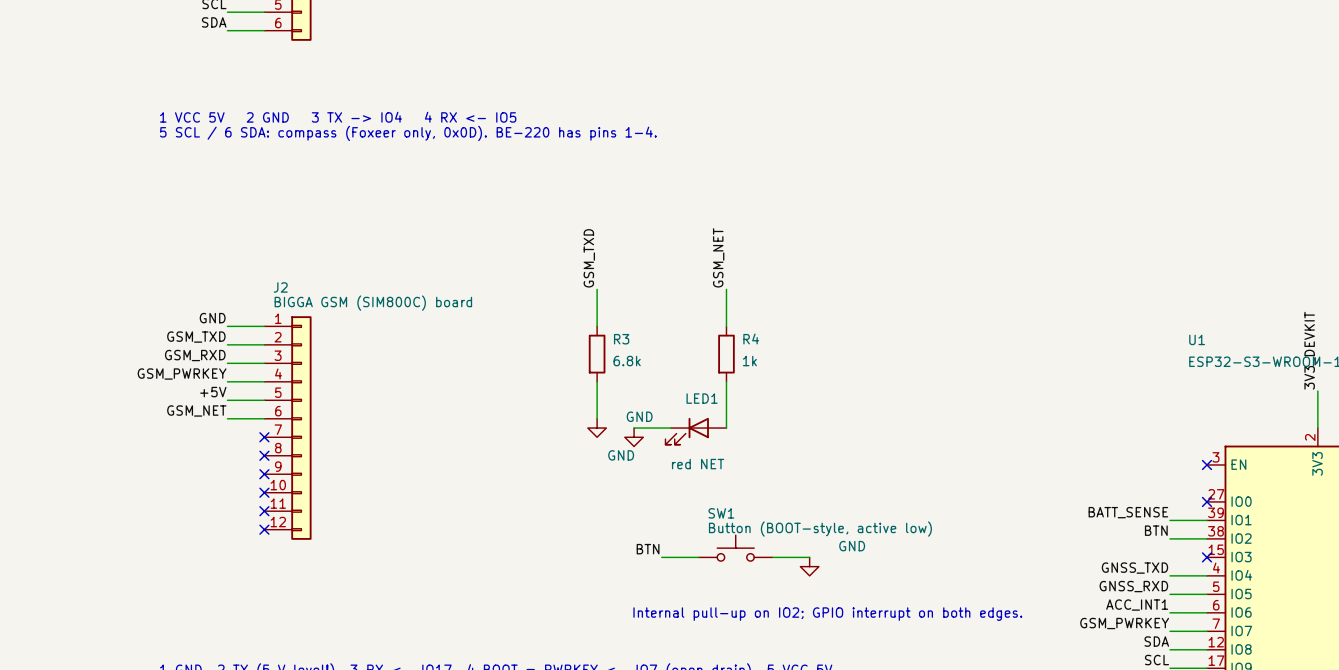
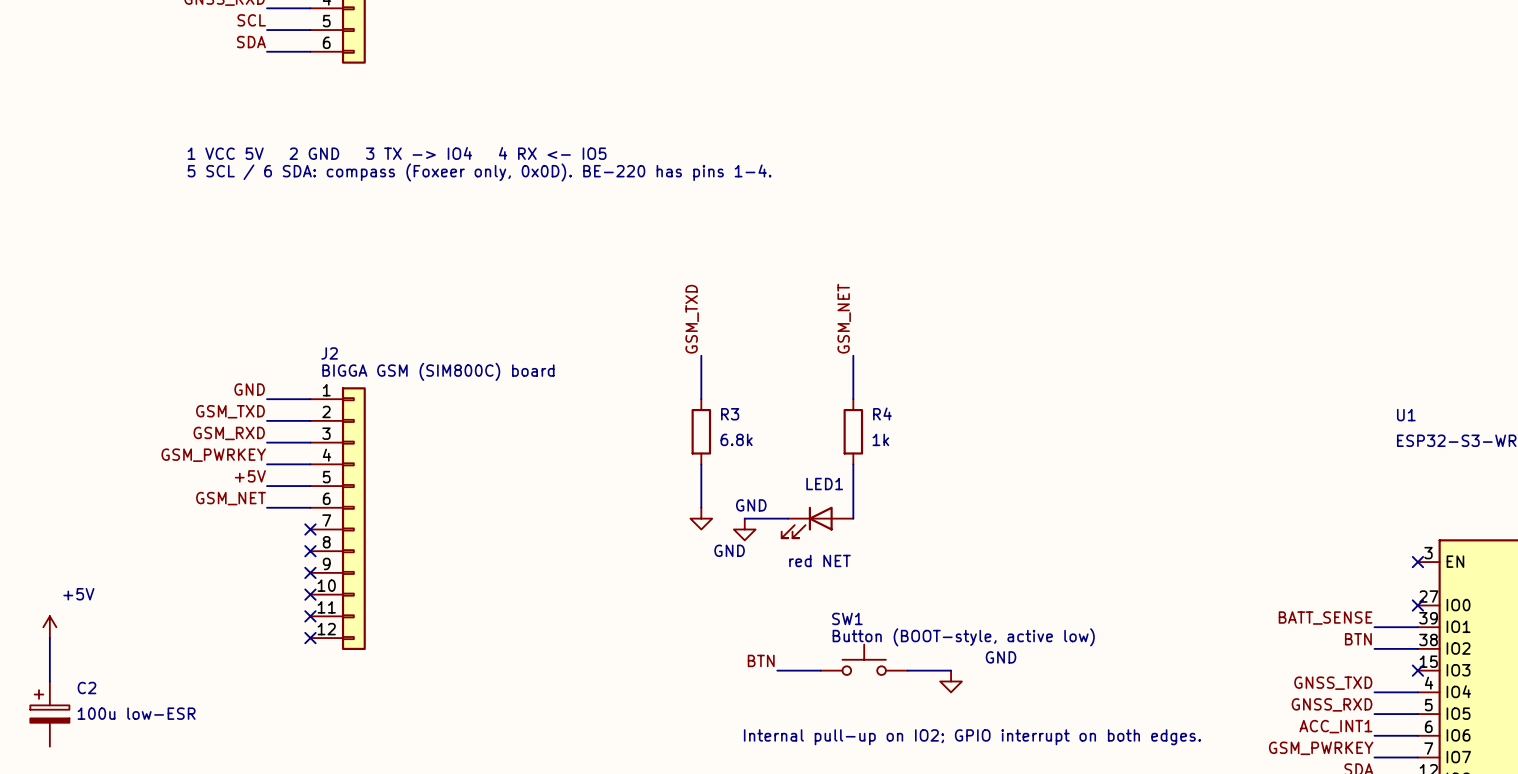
power symbol: none -> +5V (49, 627)
wire: none -> (49, 638) (49, 681)
C2: none -> 100u low-ESR (49, 714)

